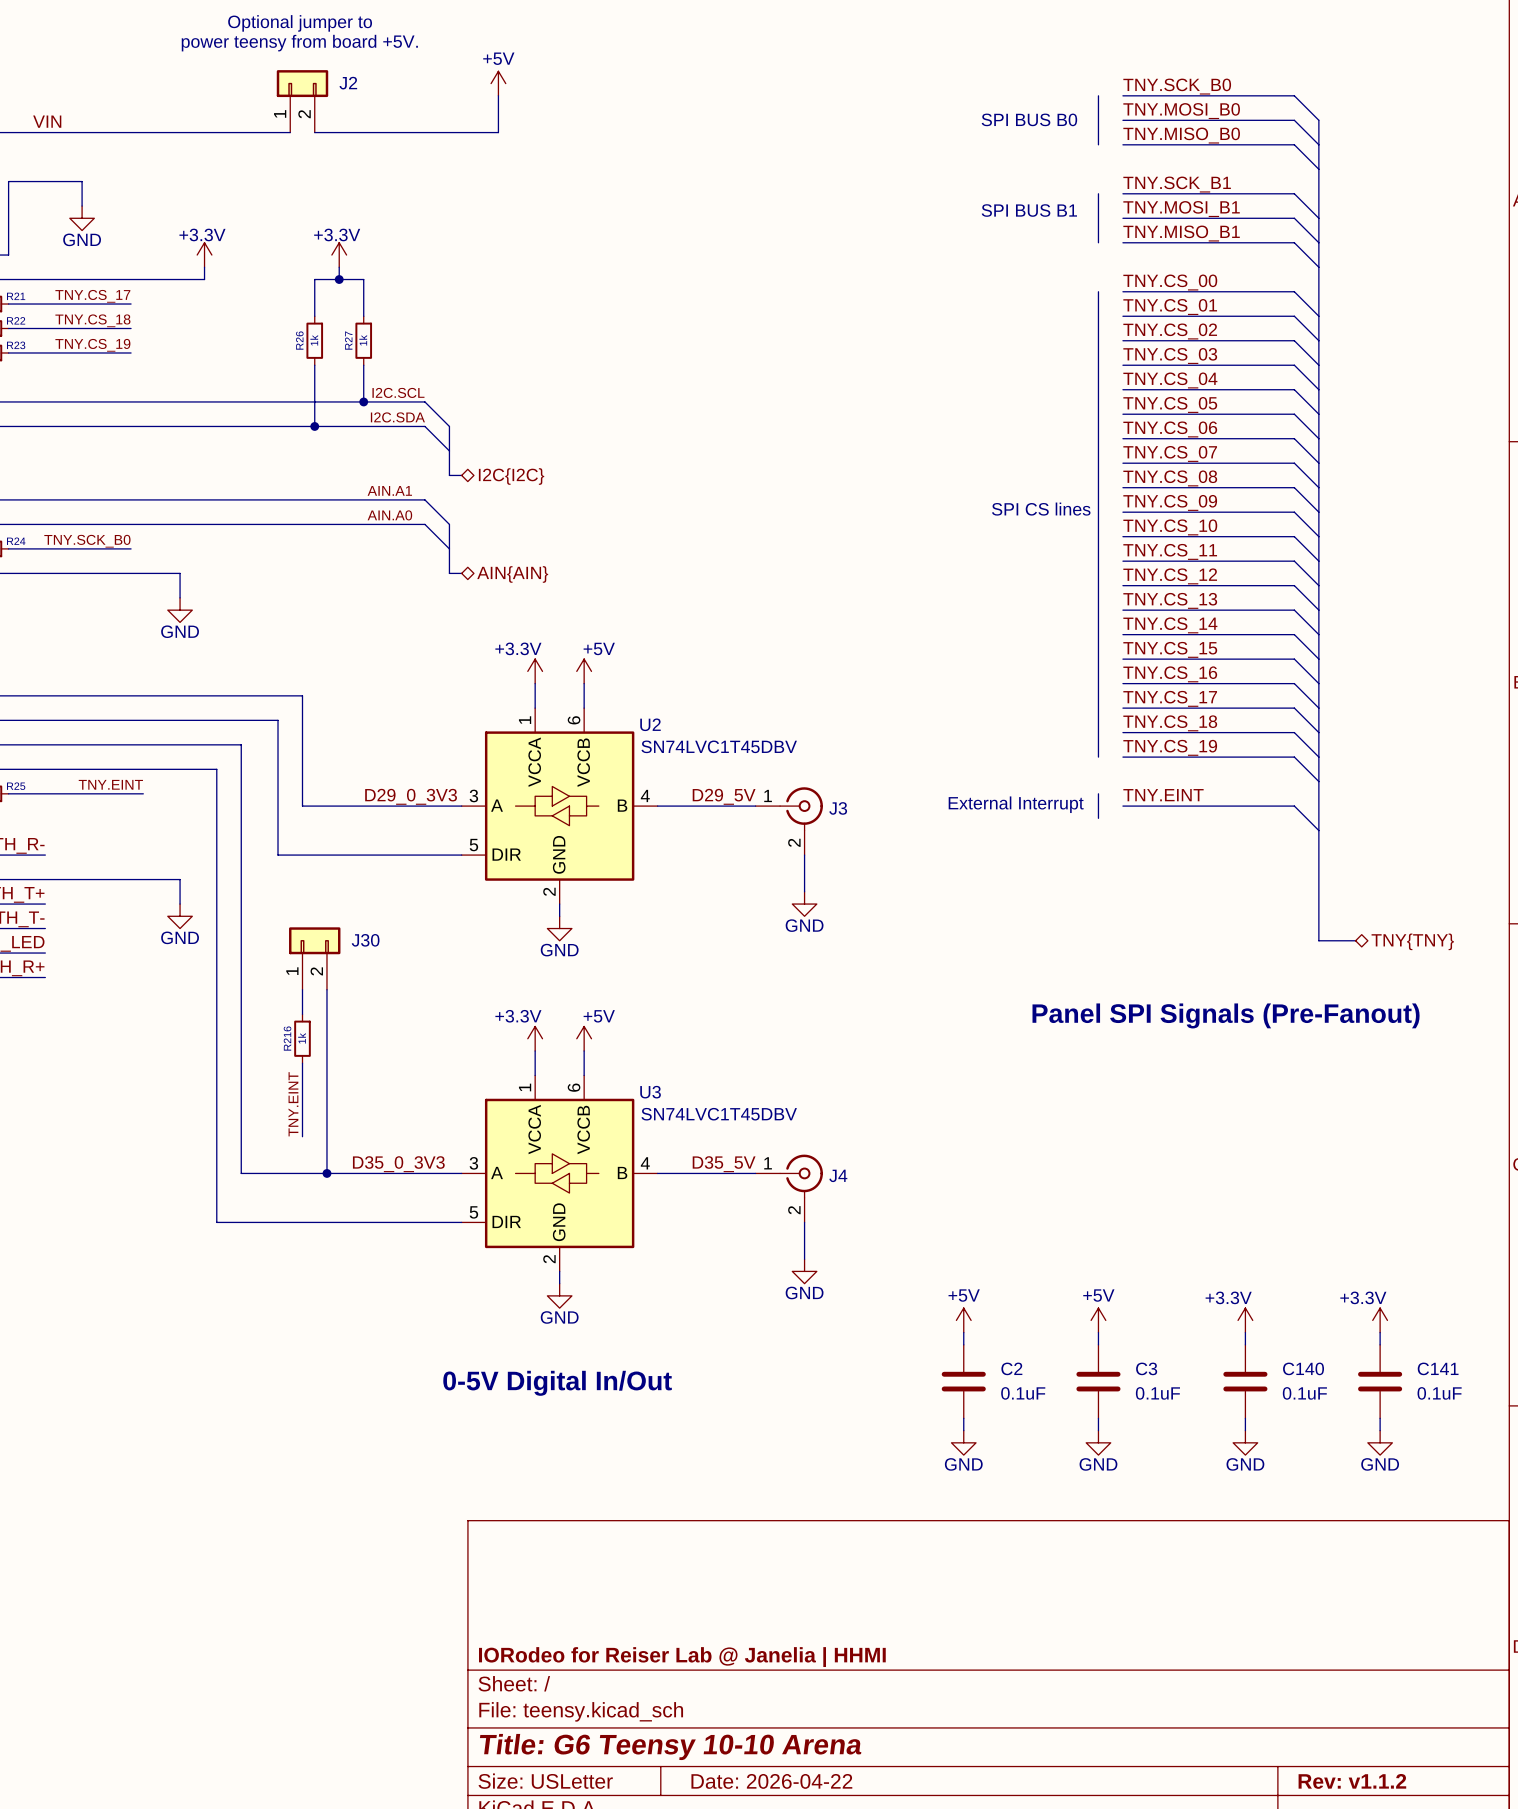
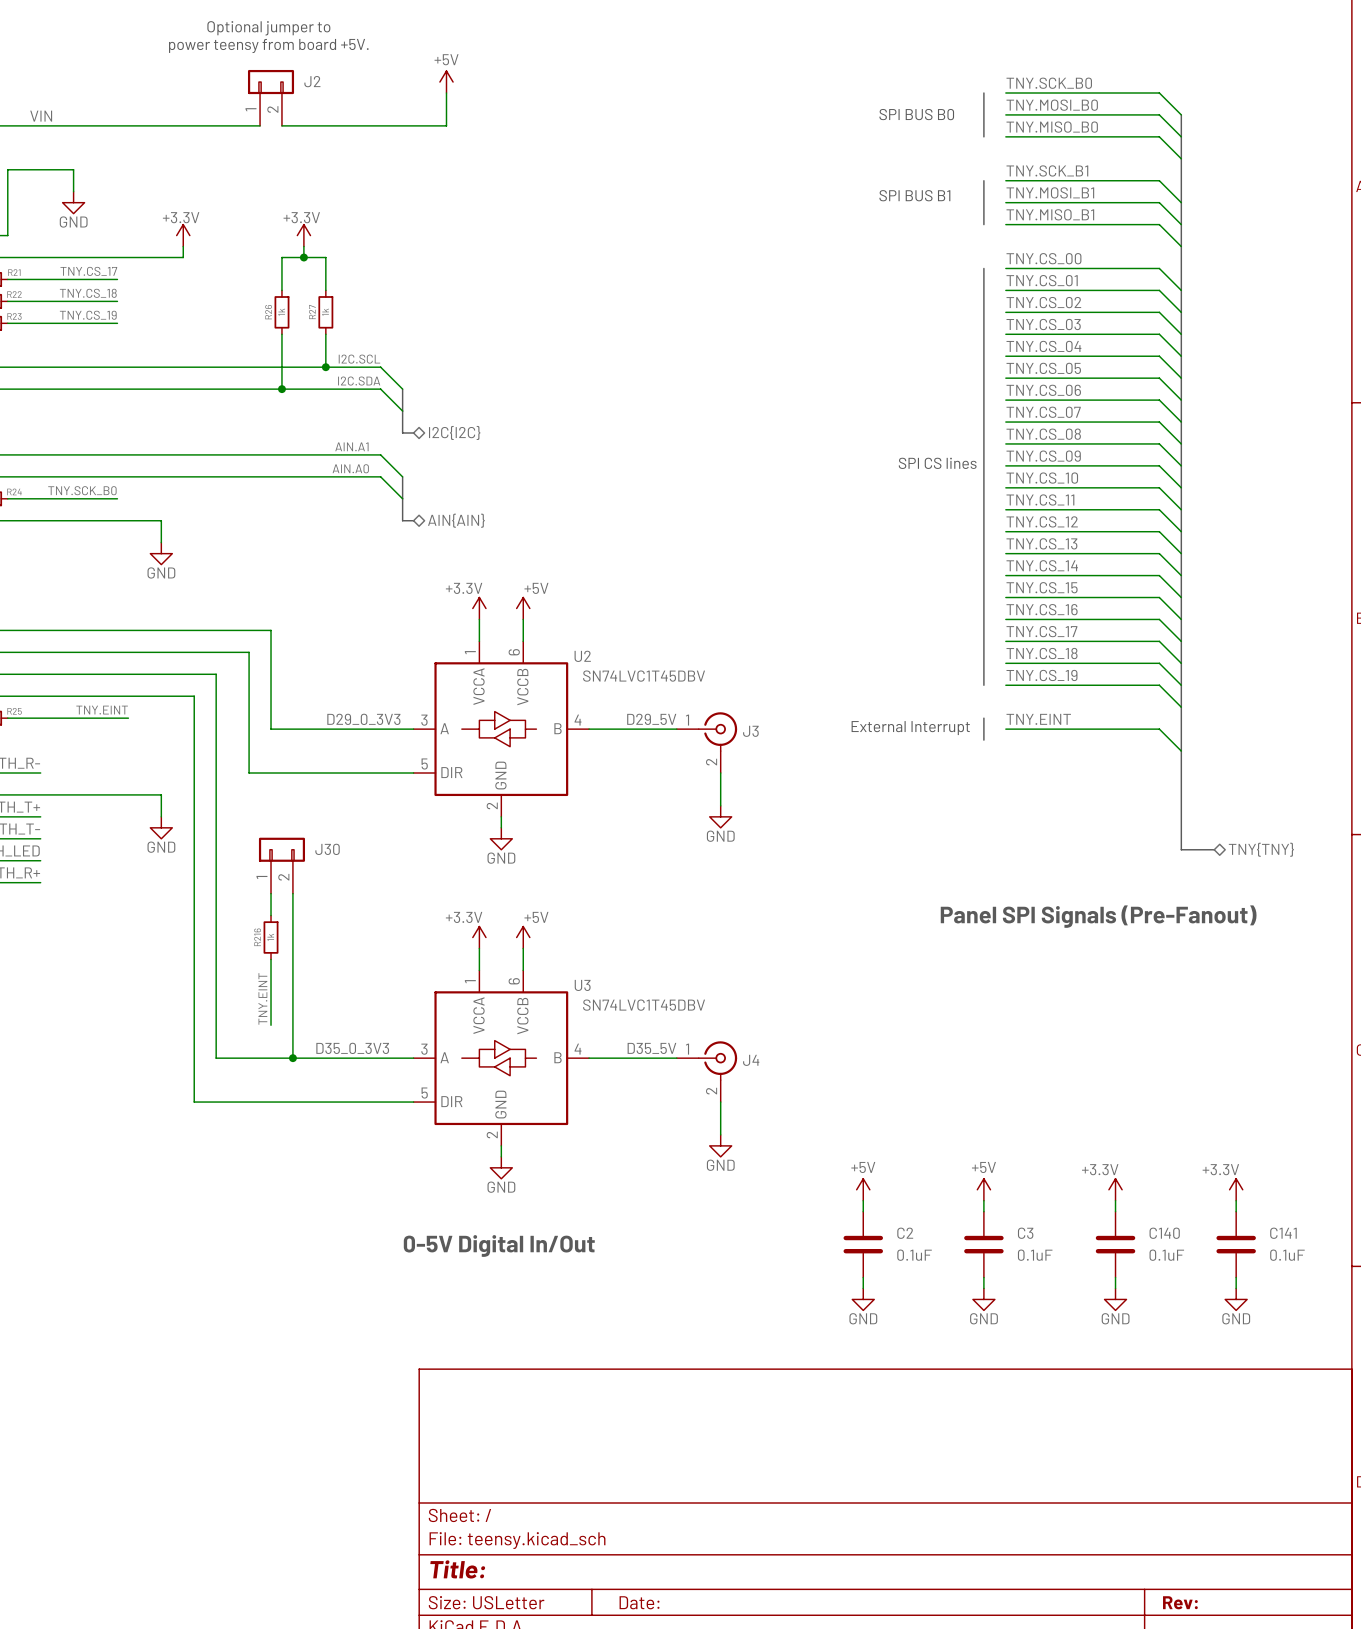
title block: IORodeo for Reiser Lab @ Janelia | HHMI (682, 1657) -> none
title block: Title: G6 Teensy 10-10 Arena (670, 1746) -> Title: (457, 1569)
title block: Date: 2026-04-22 (771, 1781) -> Date: (639, 1602)
title block: Rev: v1.1.2 (1352, 1781) -> Rev: (1180, 1602)

